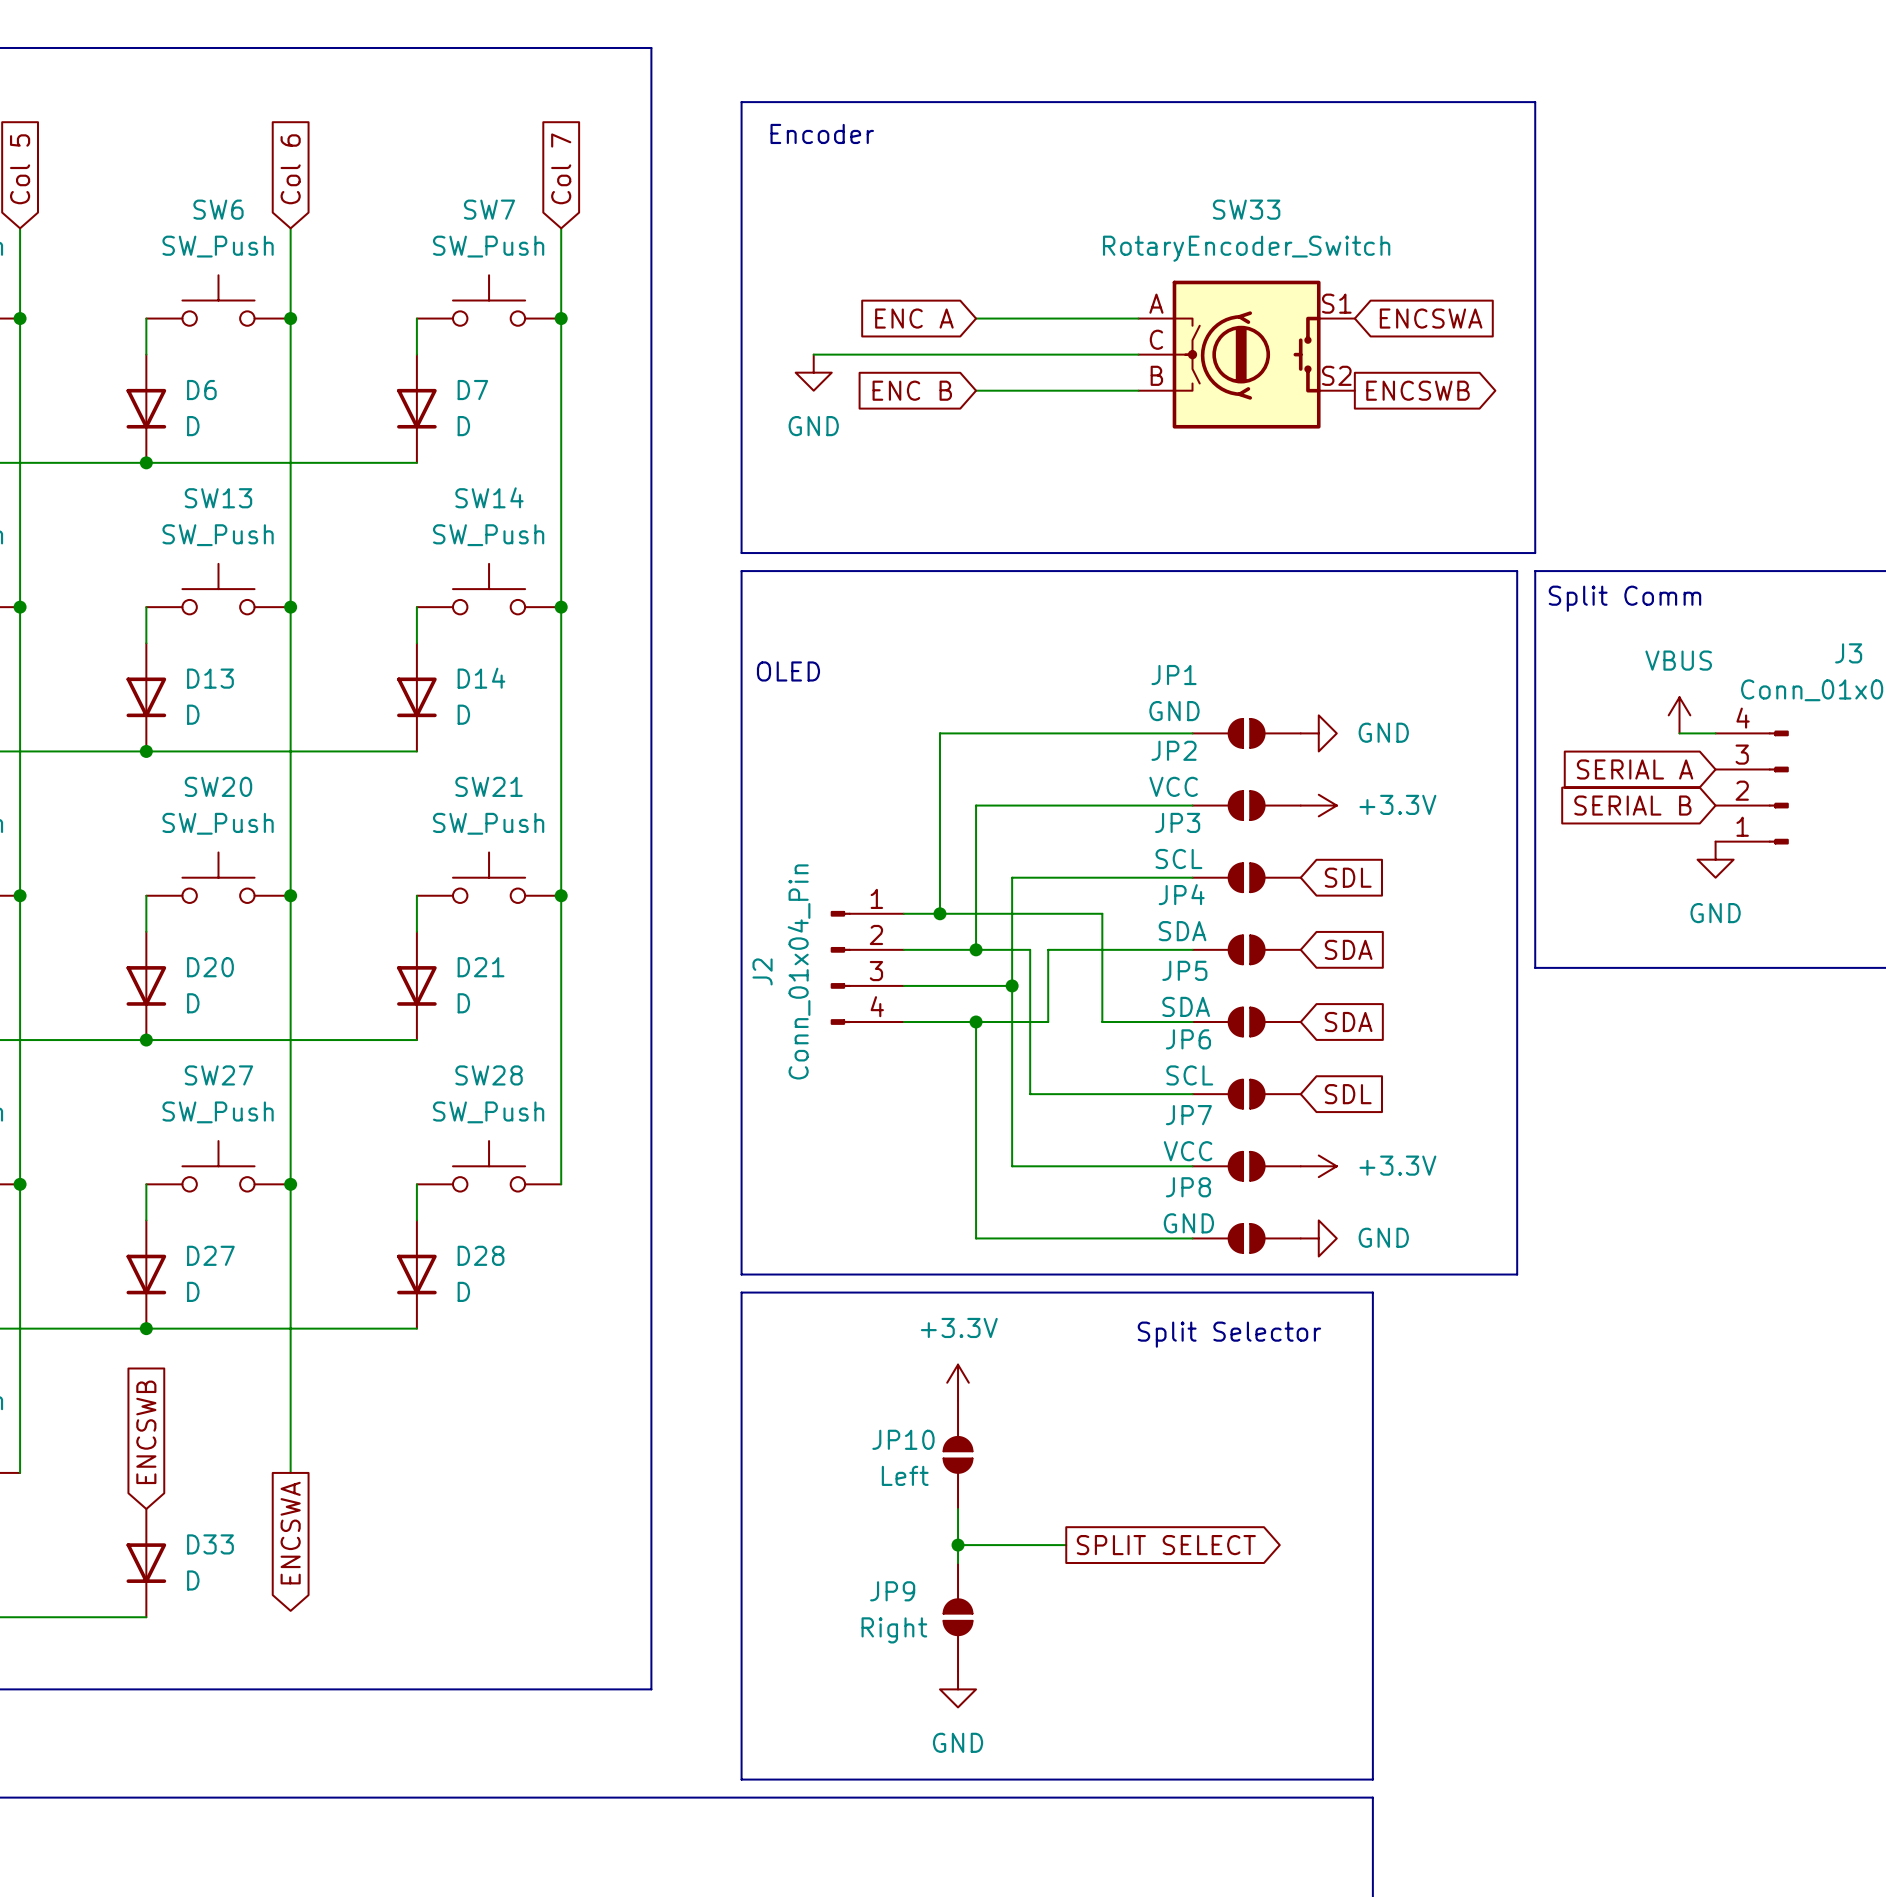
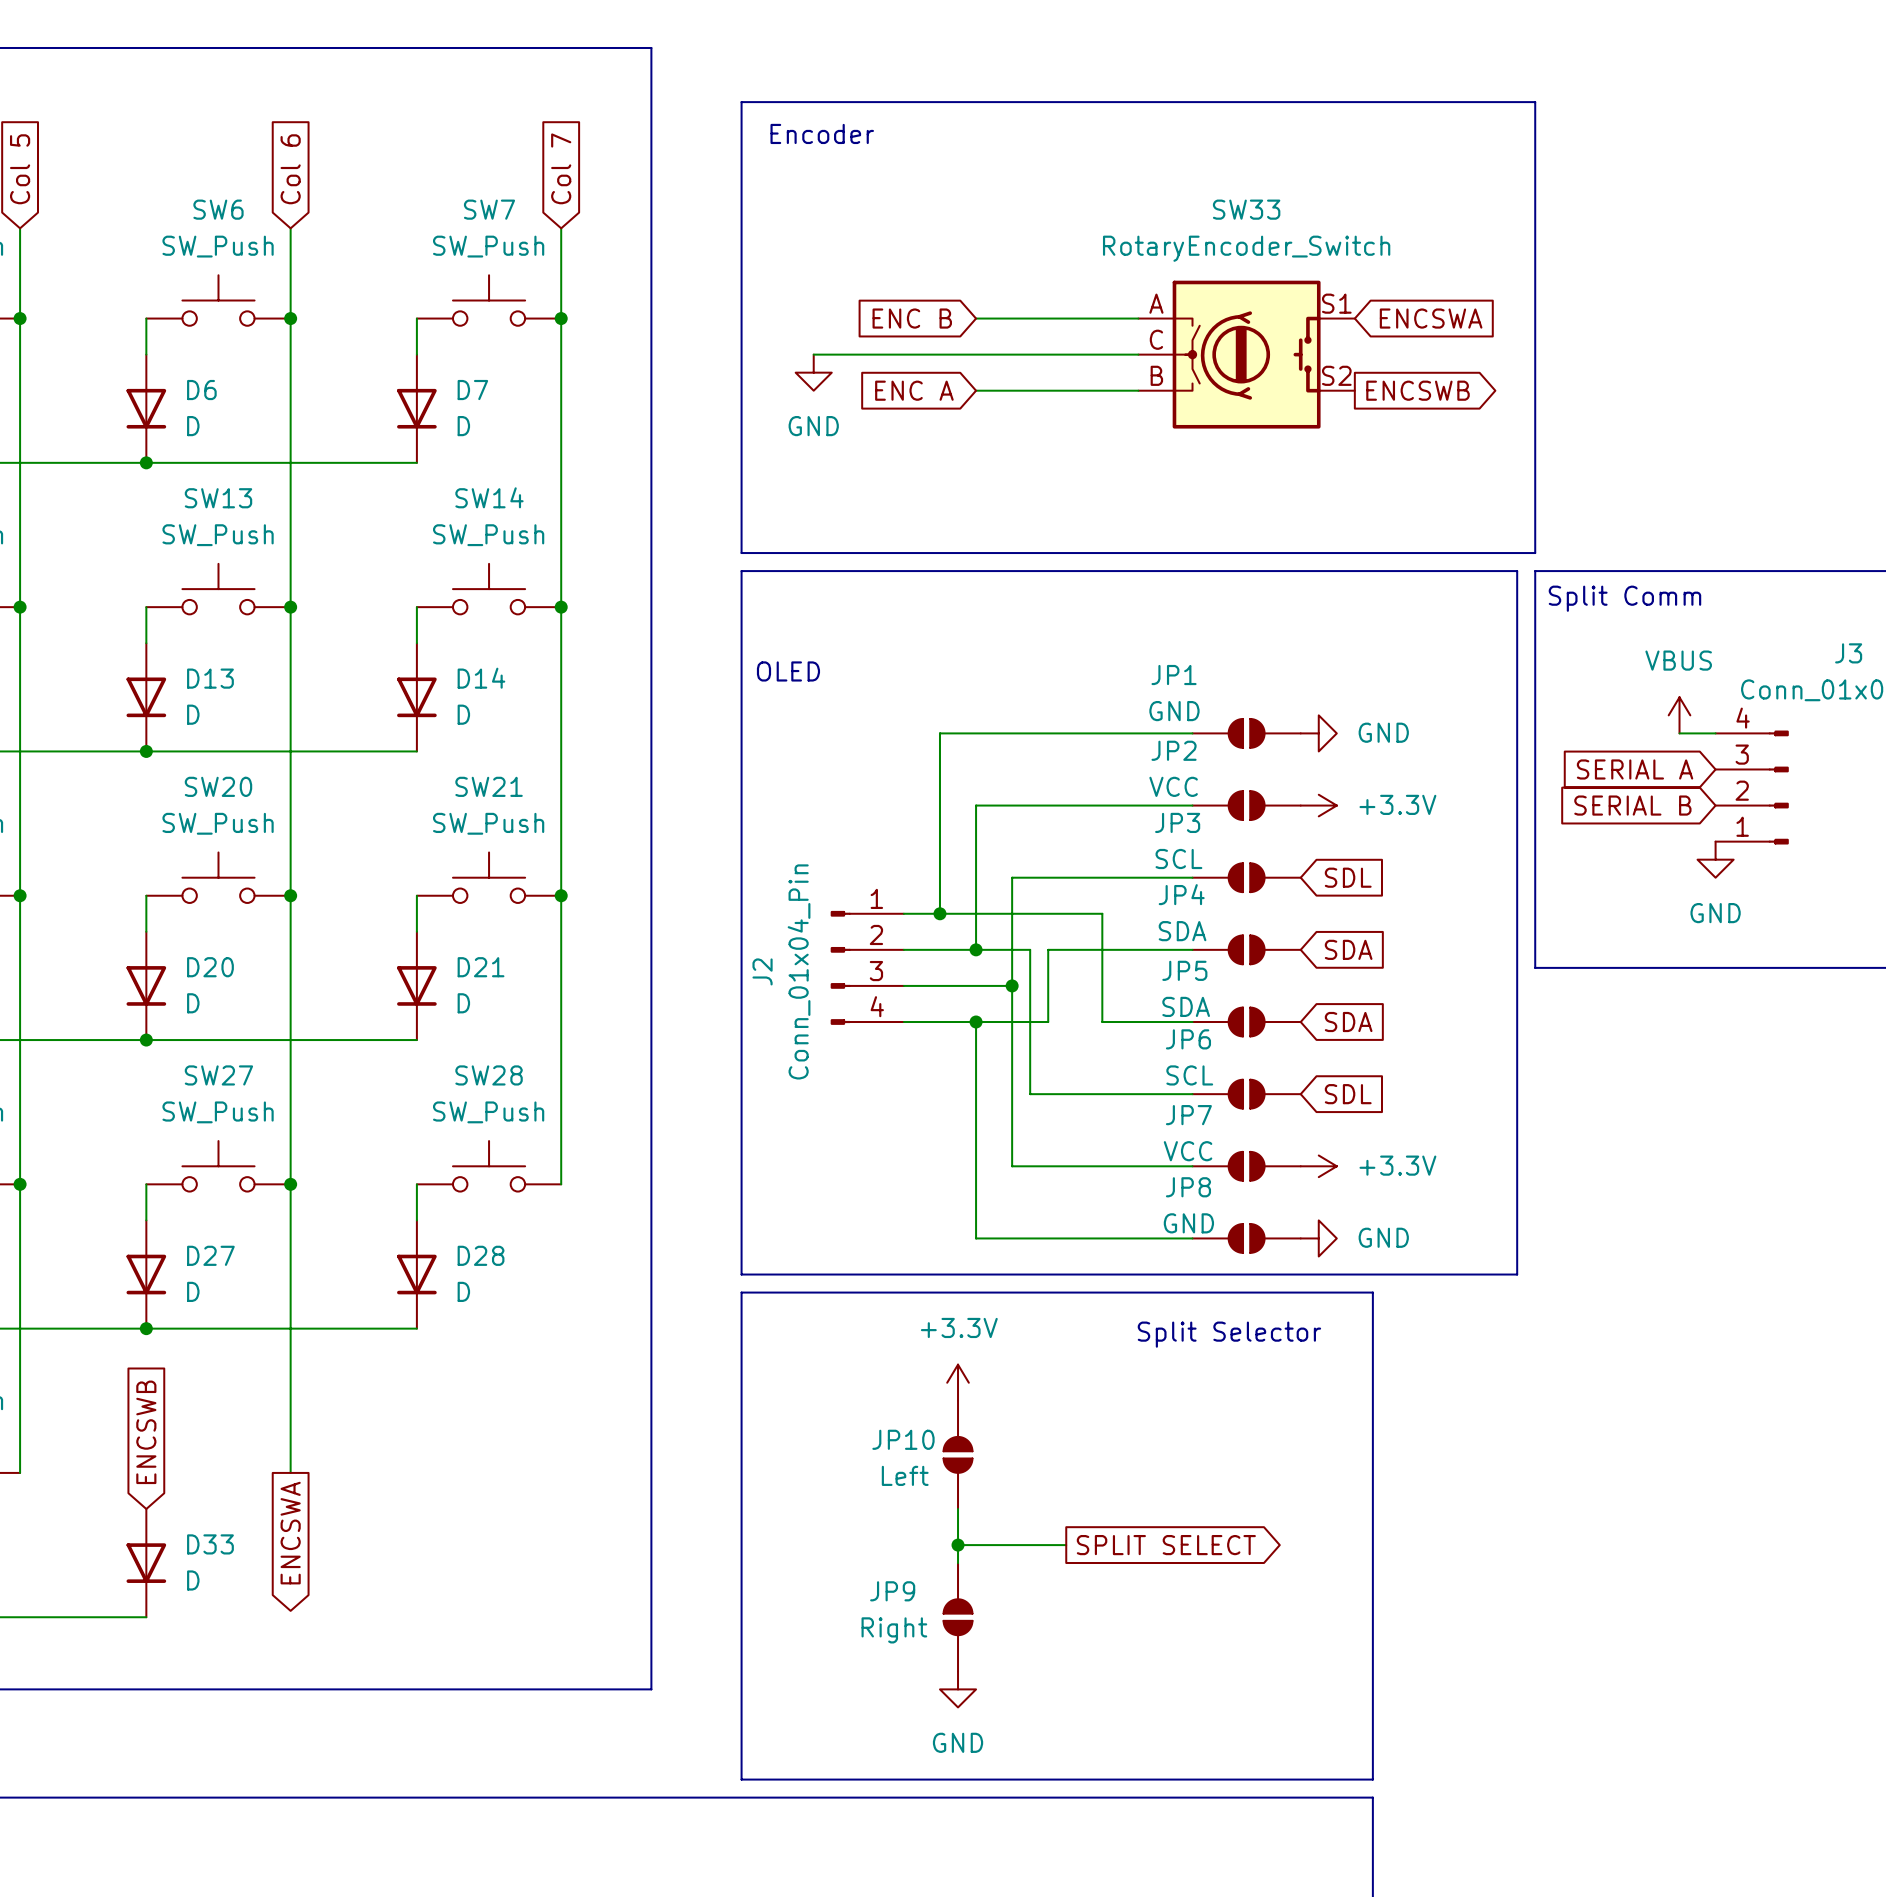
global label: ENC A (914, 318) -> ENC B (912, 318)
global label: ENC B (912, 390) -> ENC A (914, 390)

